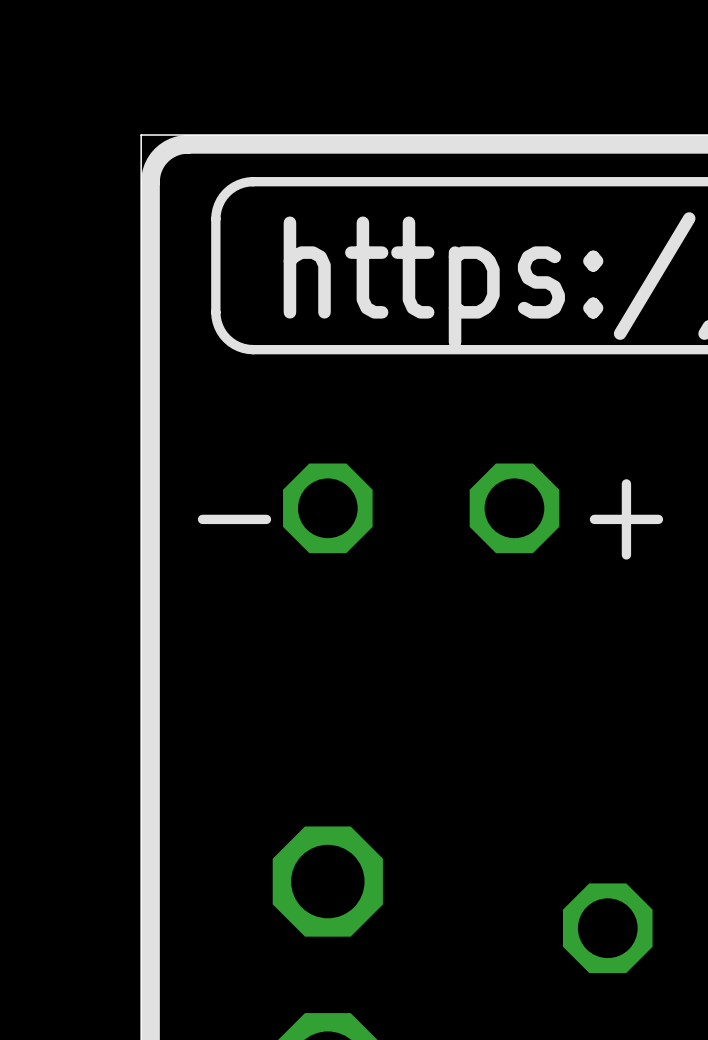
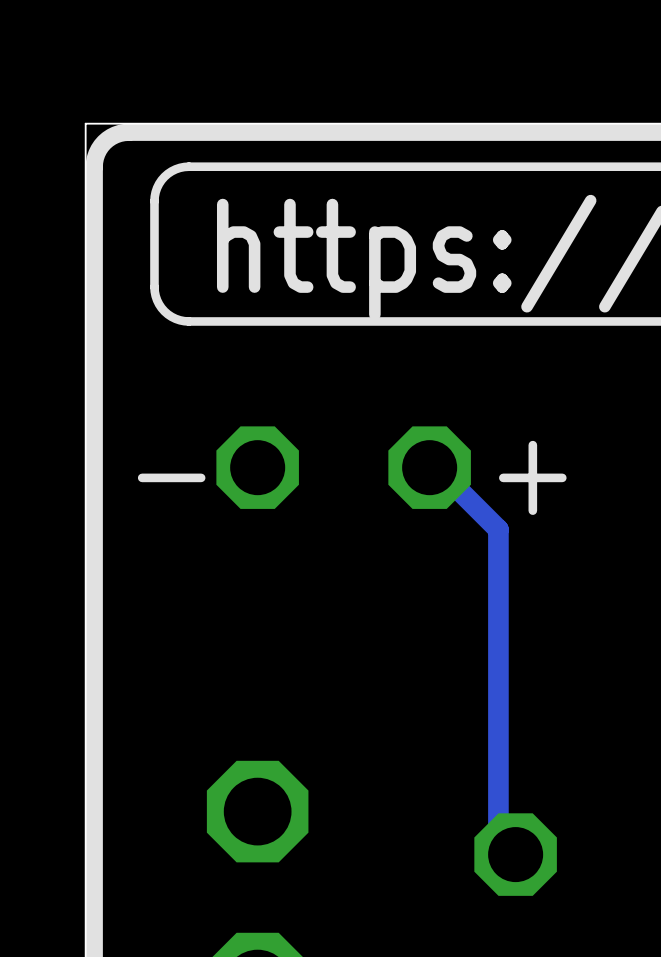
track: none -> (429, 467) (436, 467) (498, 529) (498, 839) (515, 854)

